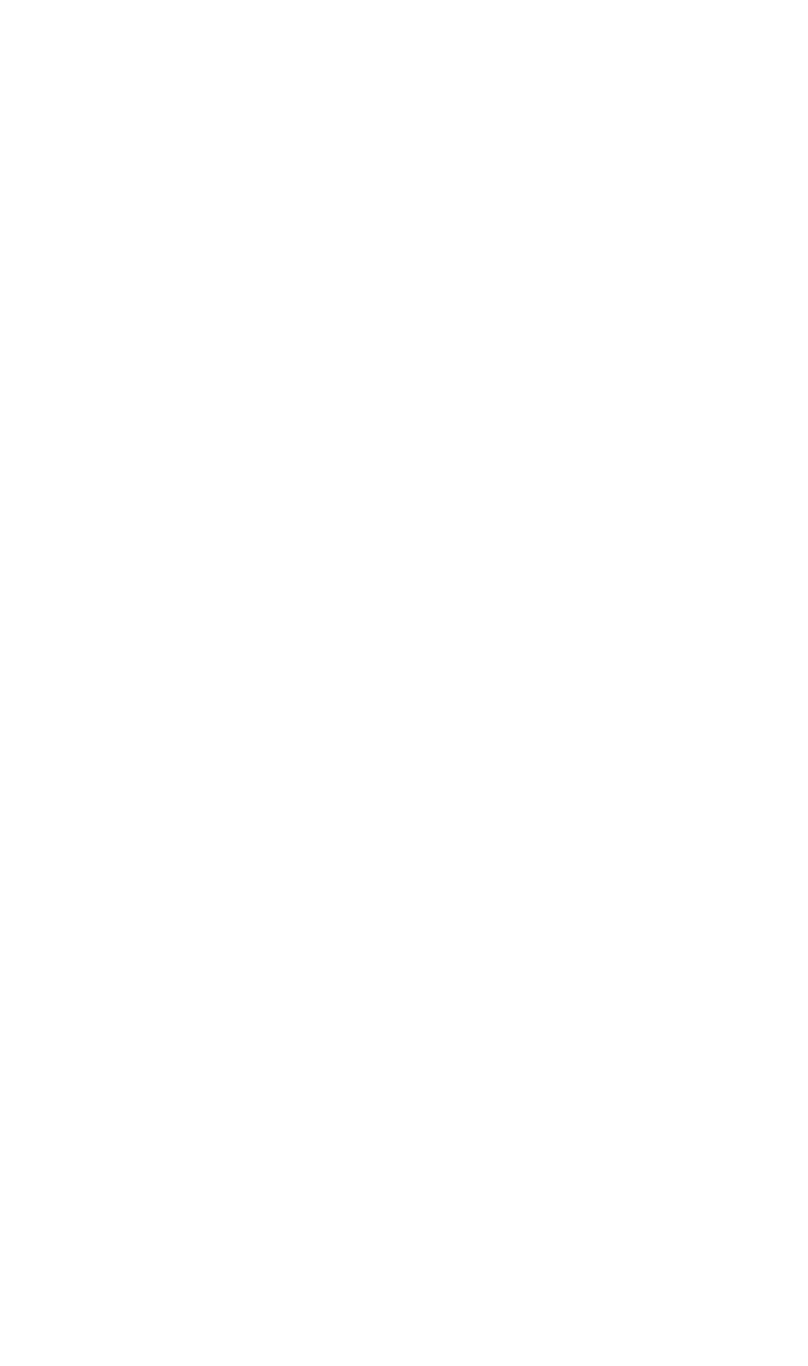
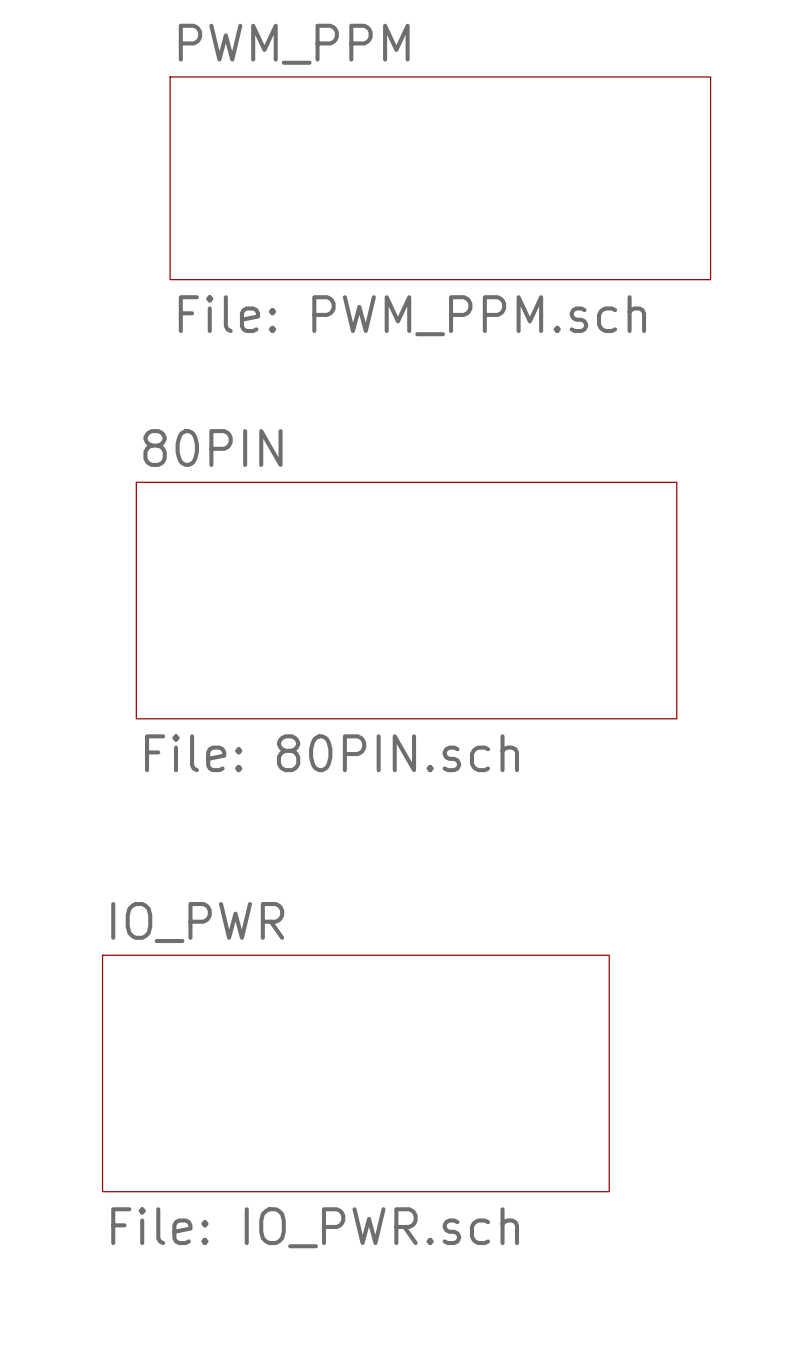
sheet PWM_PPM: none -> File: PWM_PPM.sch (440, 178)
sheet 80PIN: none -> File: 80PIN.sch (406, 600)
sheet IO_PWR: none -> File: IO_PWR.sch (355, 1073)

